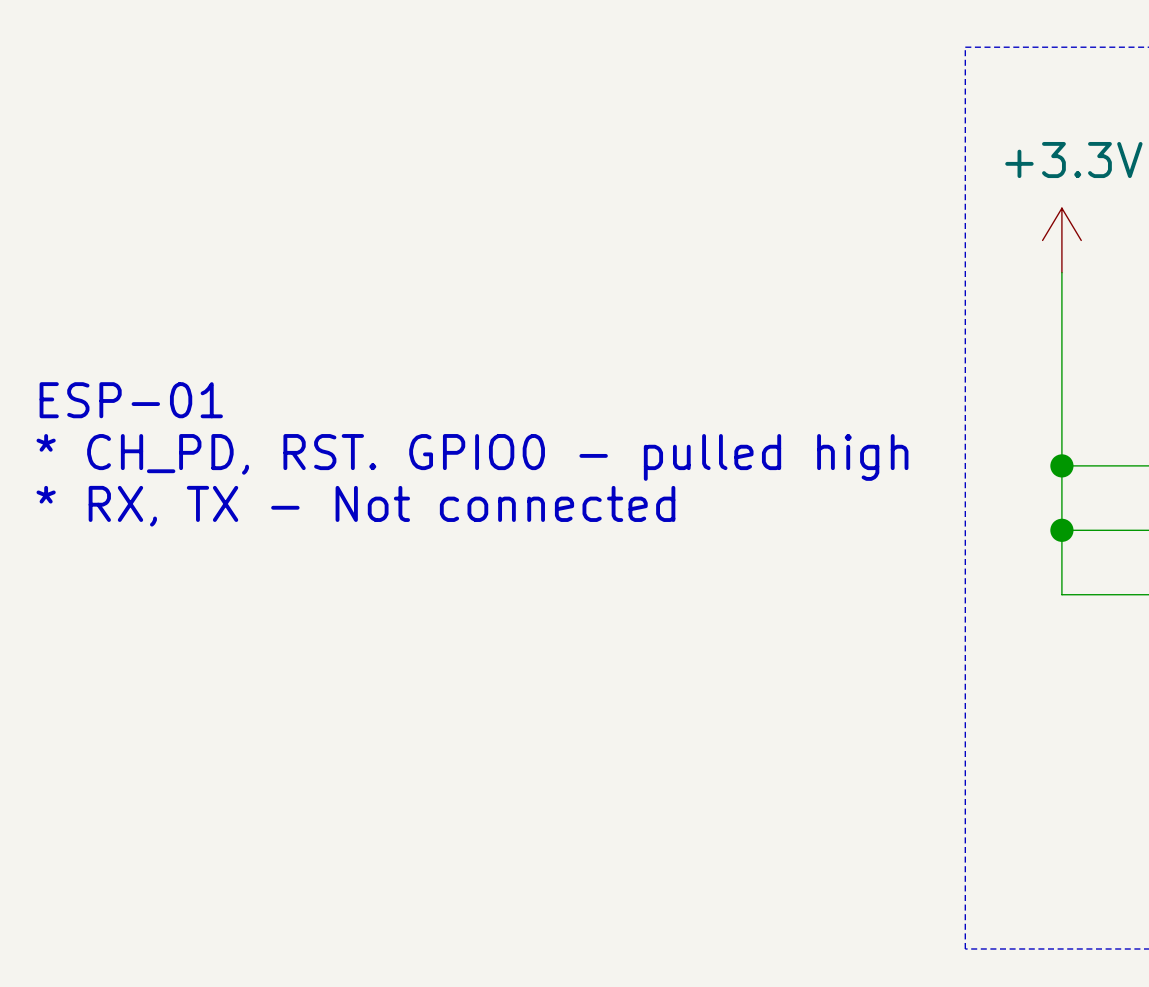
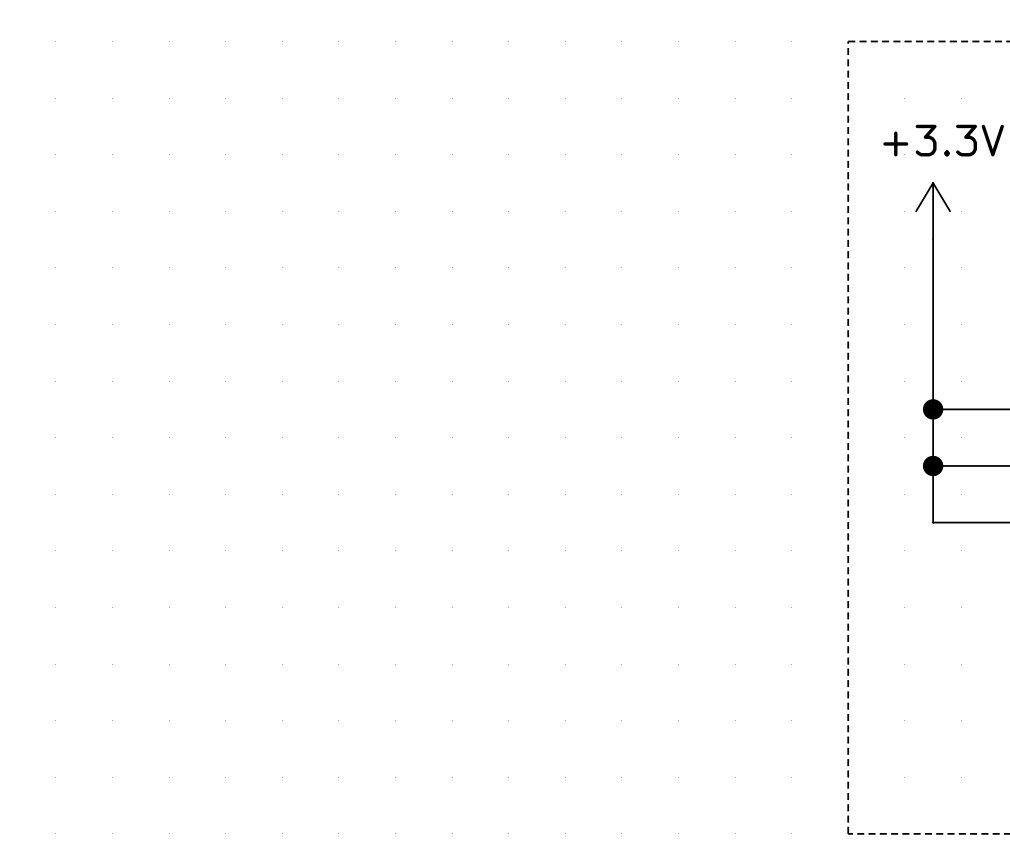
text: ESP-01 (131, 400) -> none
text: * CH_PD, RST. GPIO0 - pulled high (472, 457) -> none
text: * RX, TX - Not connected (355, 506) -> none

